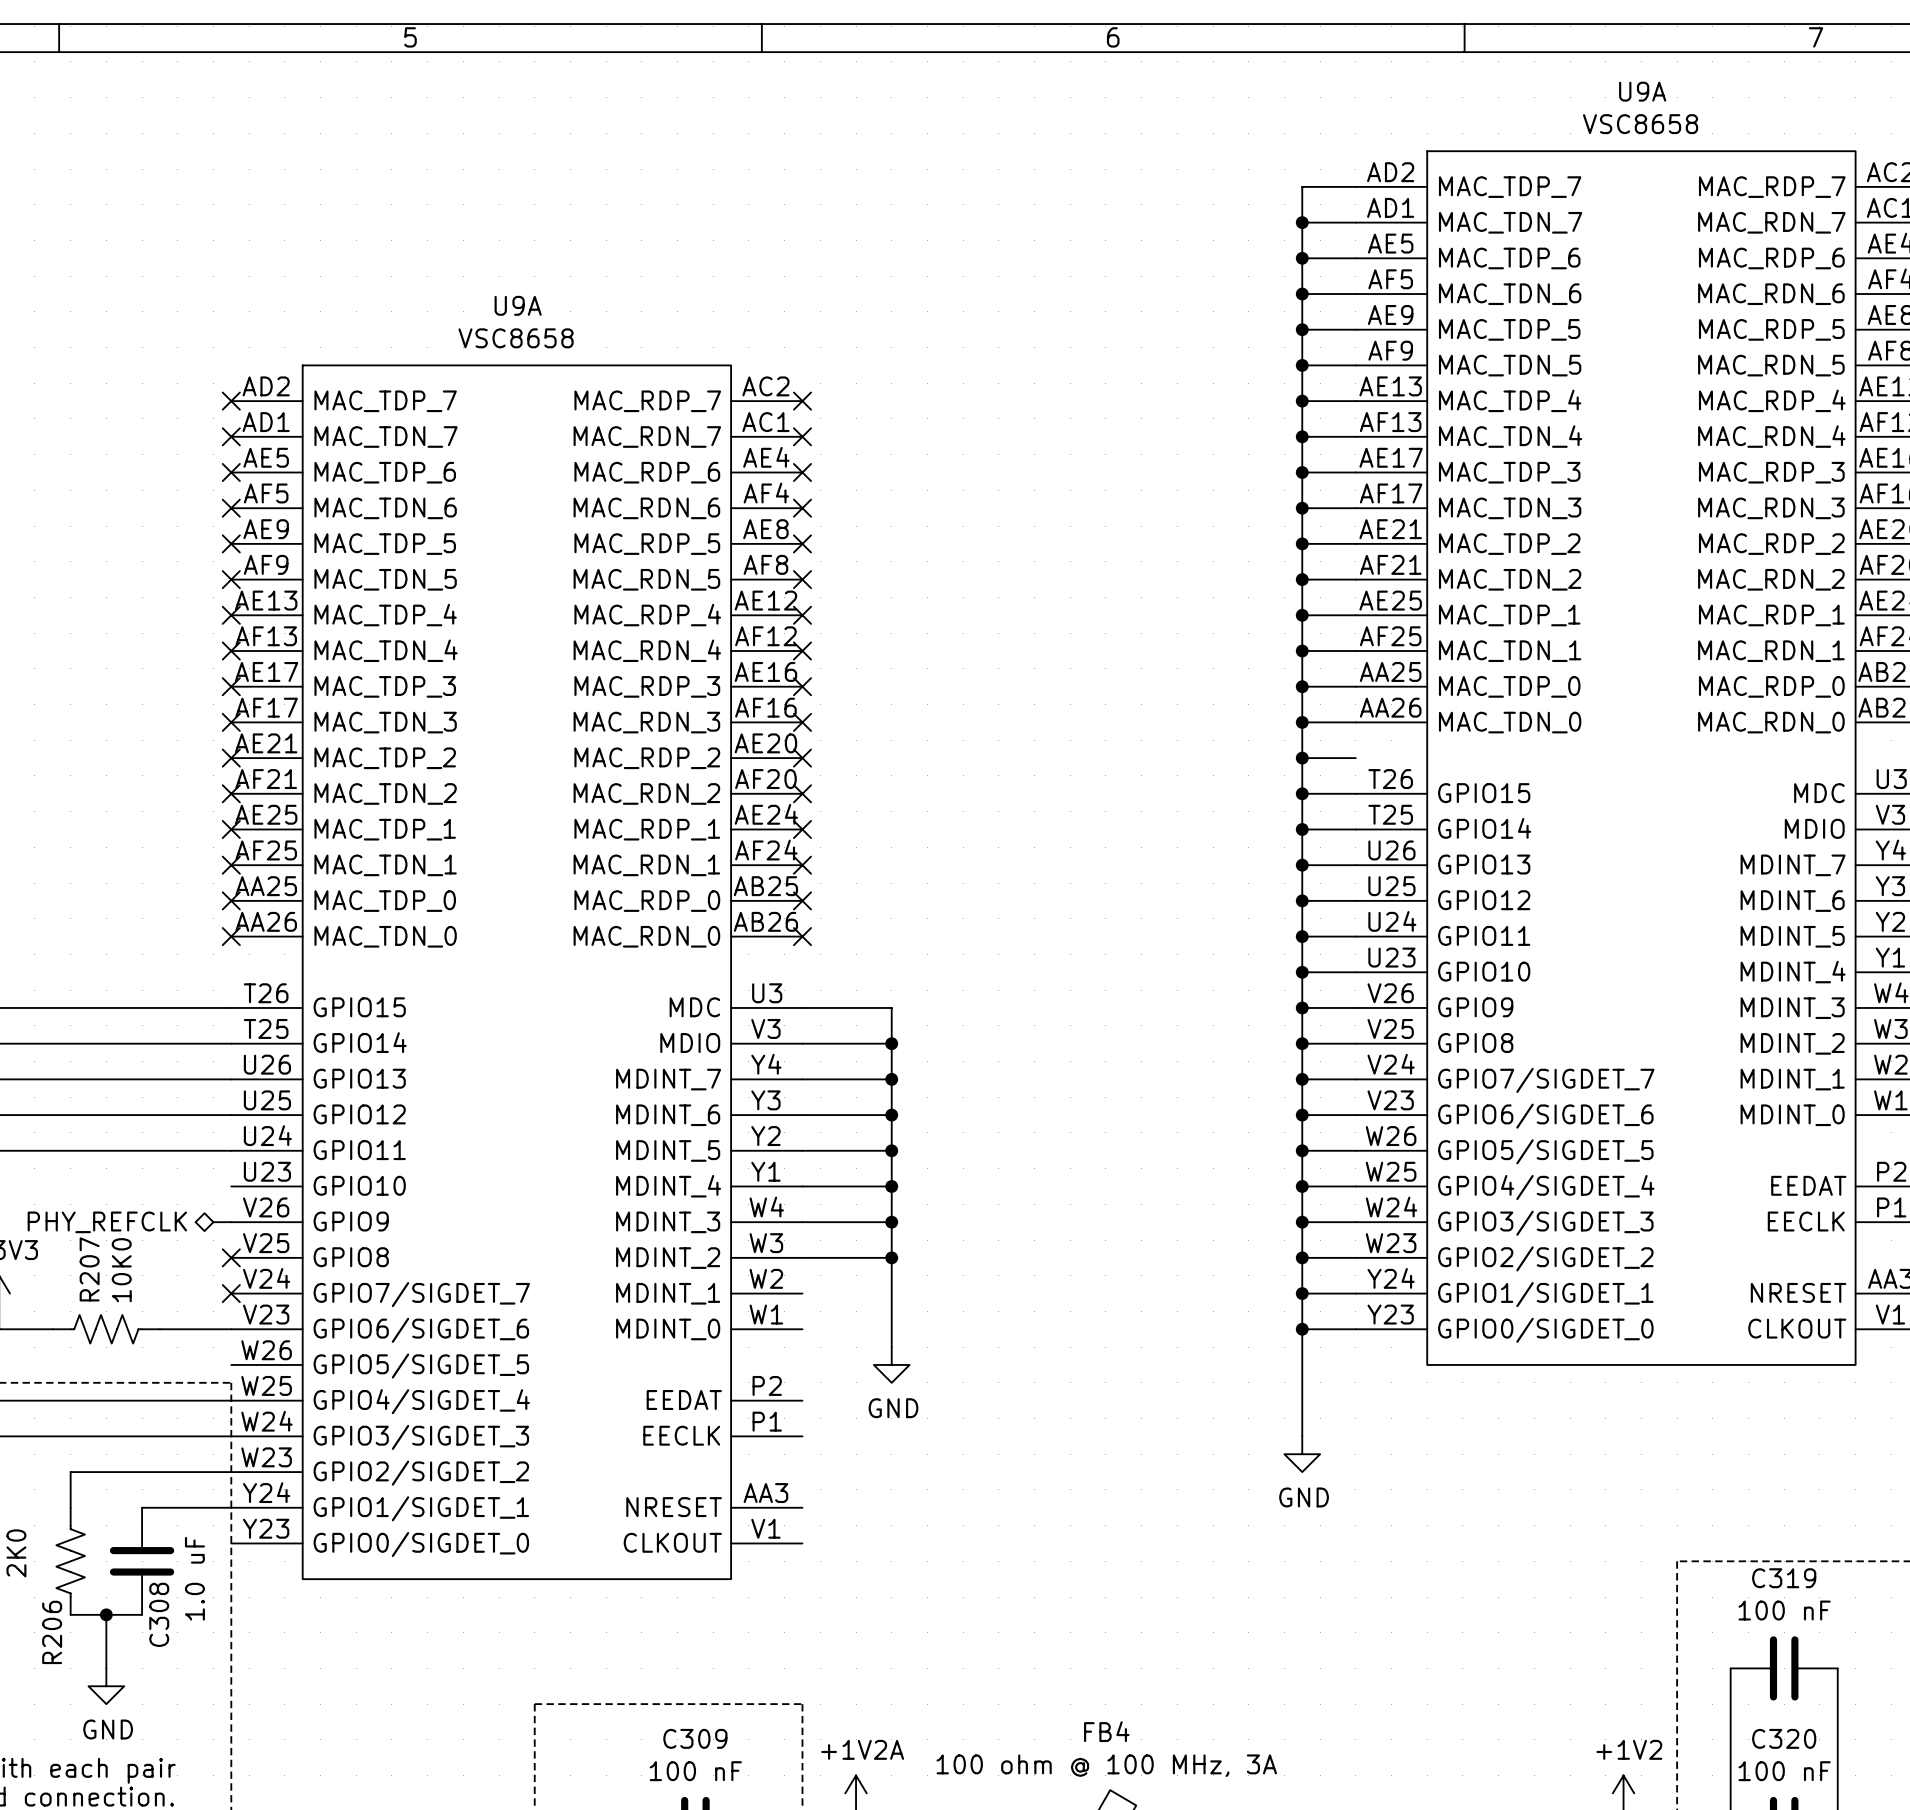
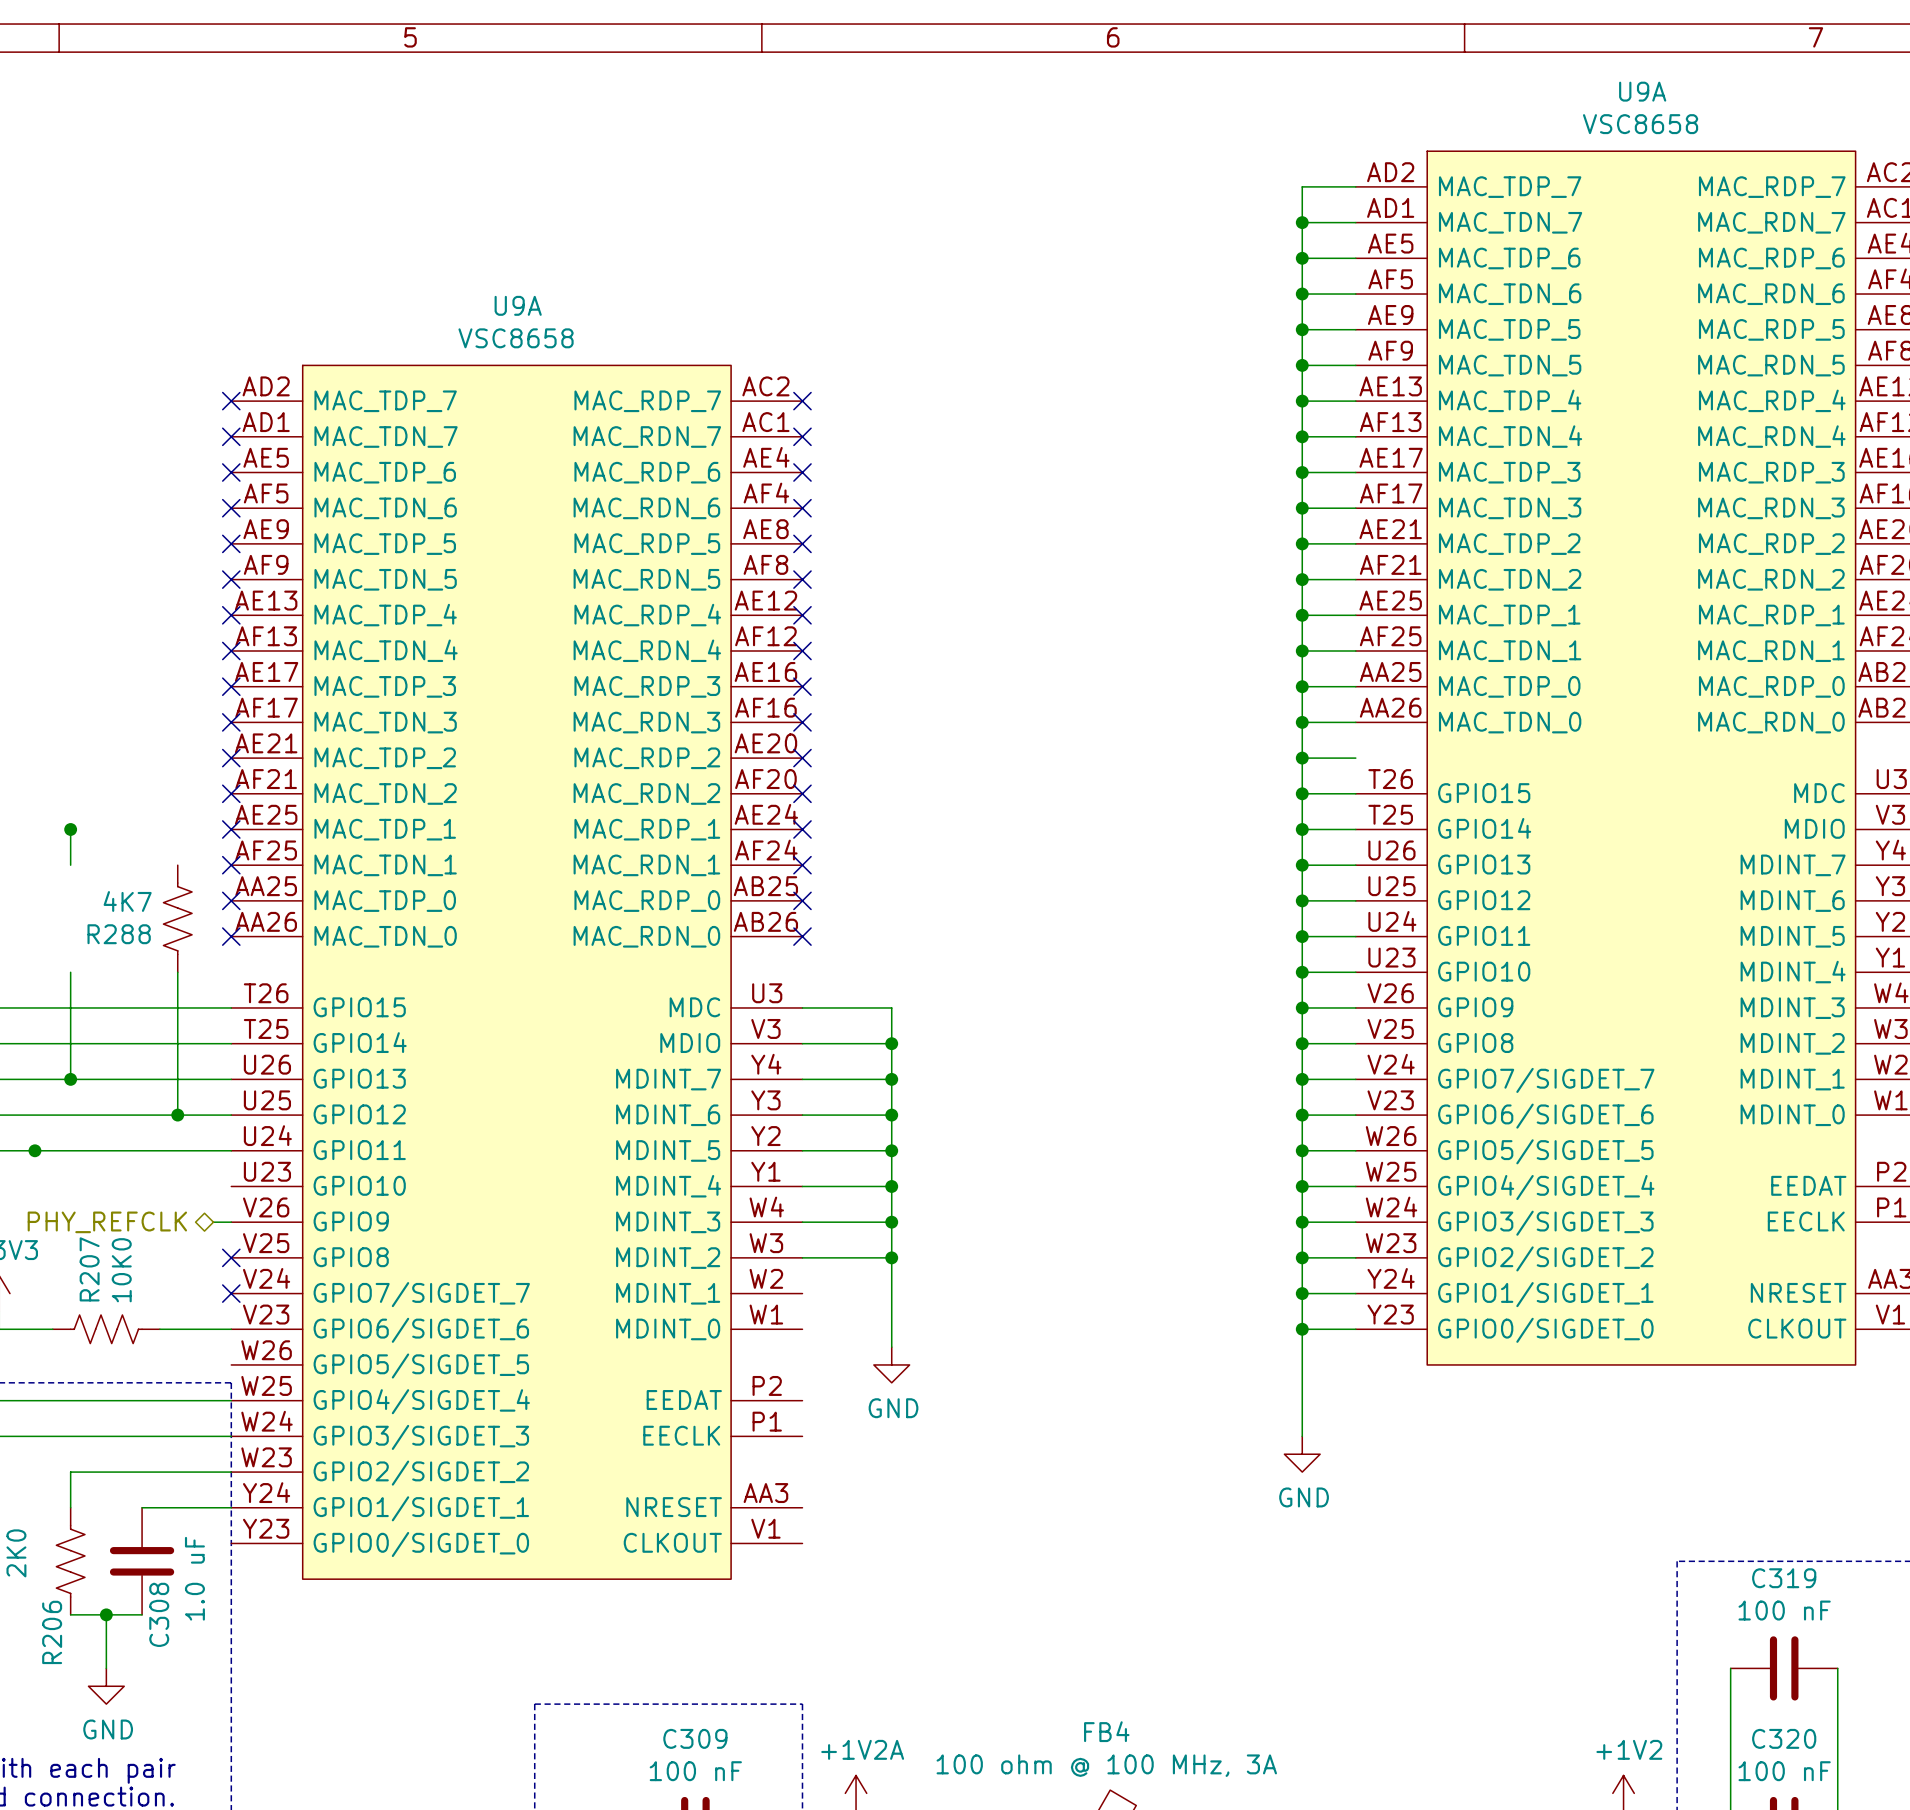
wire: none -> (70, 829) (70, 865)
junction: none -> (70, 829)
R288: none -> 4K7 (177, 918)
wire: none -> (70, 972) (70, 1079)
wire: none -> (177, 972) (177, 1115)
junction: none -> (70, 1079)
junction: none -> (177, 1115)
junction: none -> (34, 1150)

